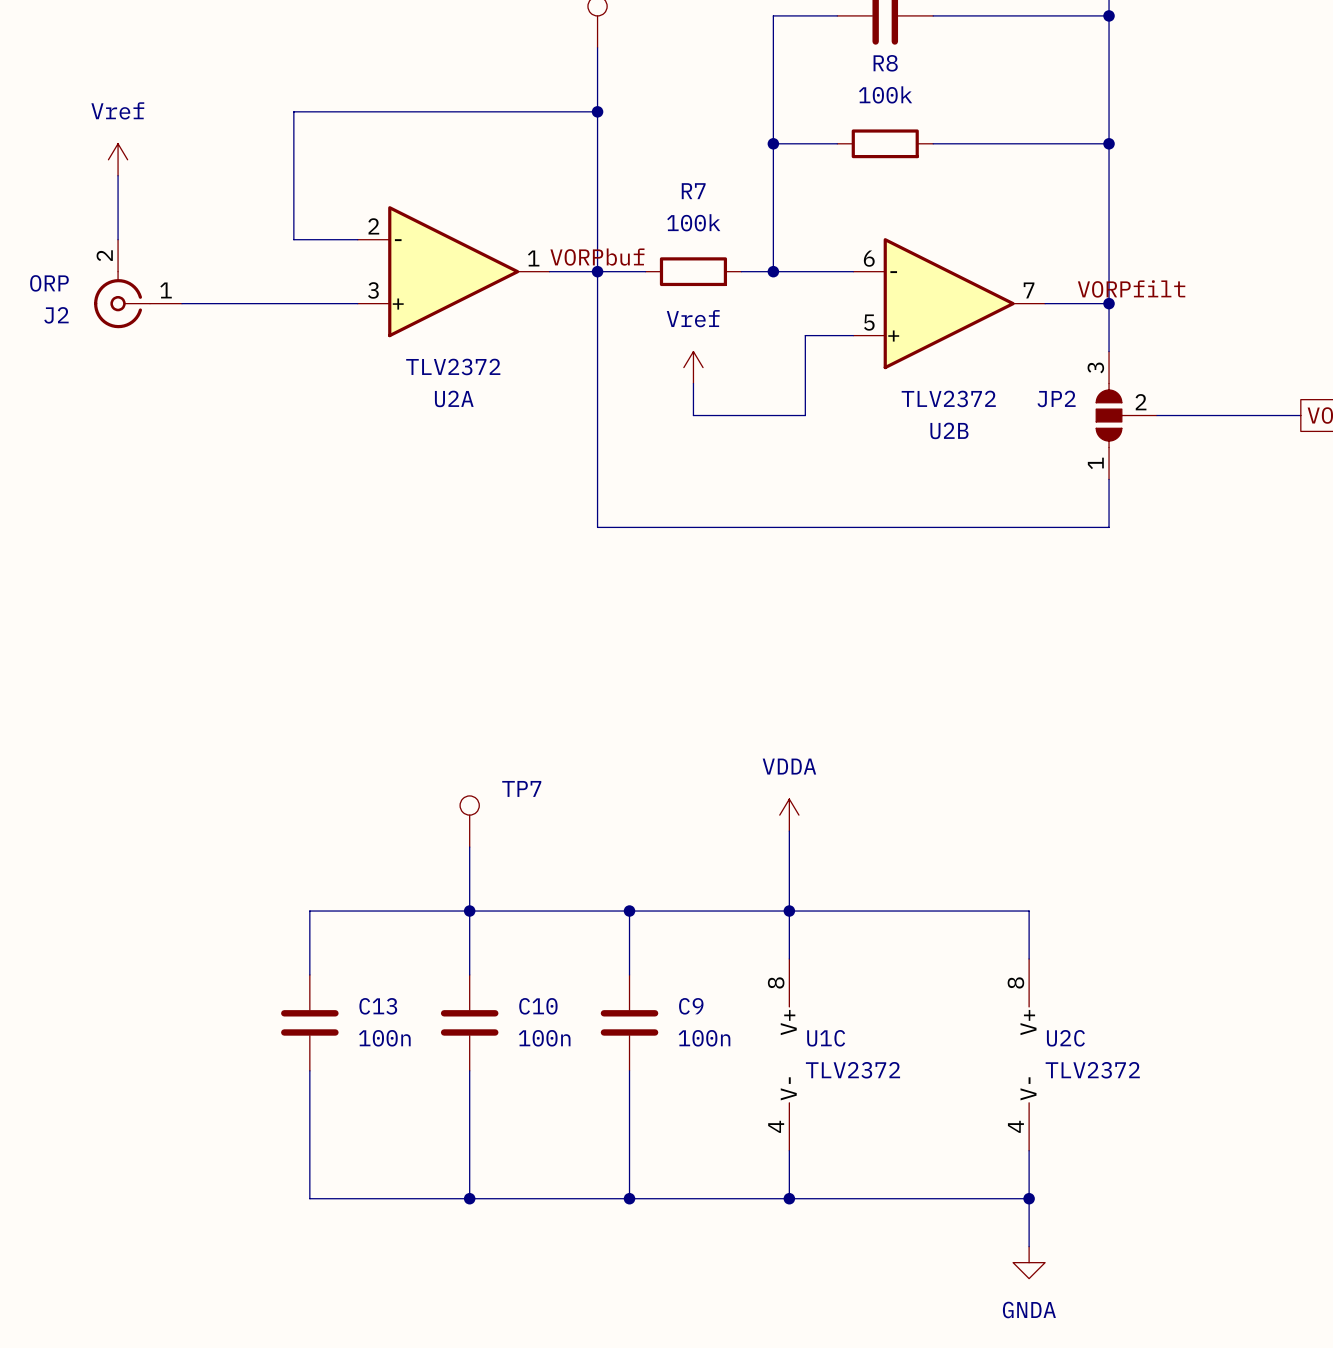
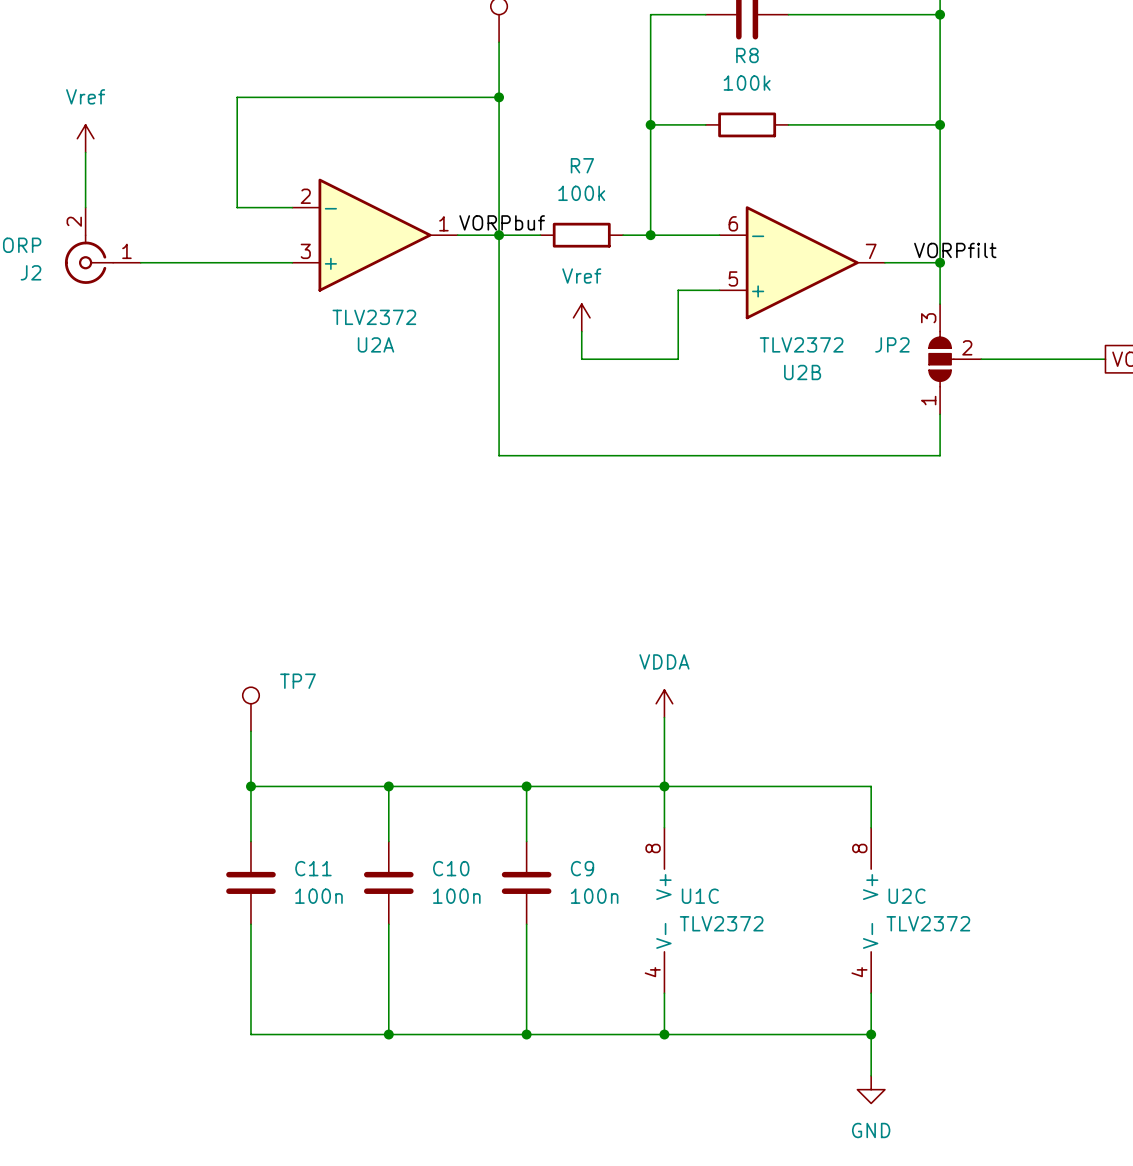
TP7 position: (469, 821) -> (250, 709)
wire: (469, 847) (469, 911) -> (250, 731) (250, 786)
junction: none -> (250, 786)
C13 name: C13 (378, 1006) -> C11 (313, 868)
power symbol: GNDA (1029, 1262) -> GND (871, 1089)

